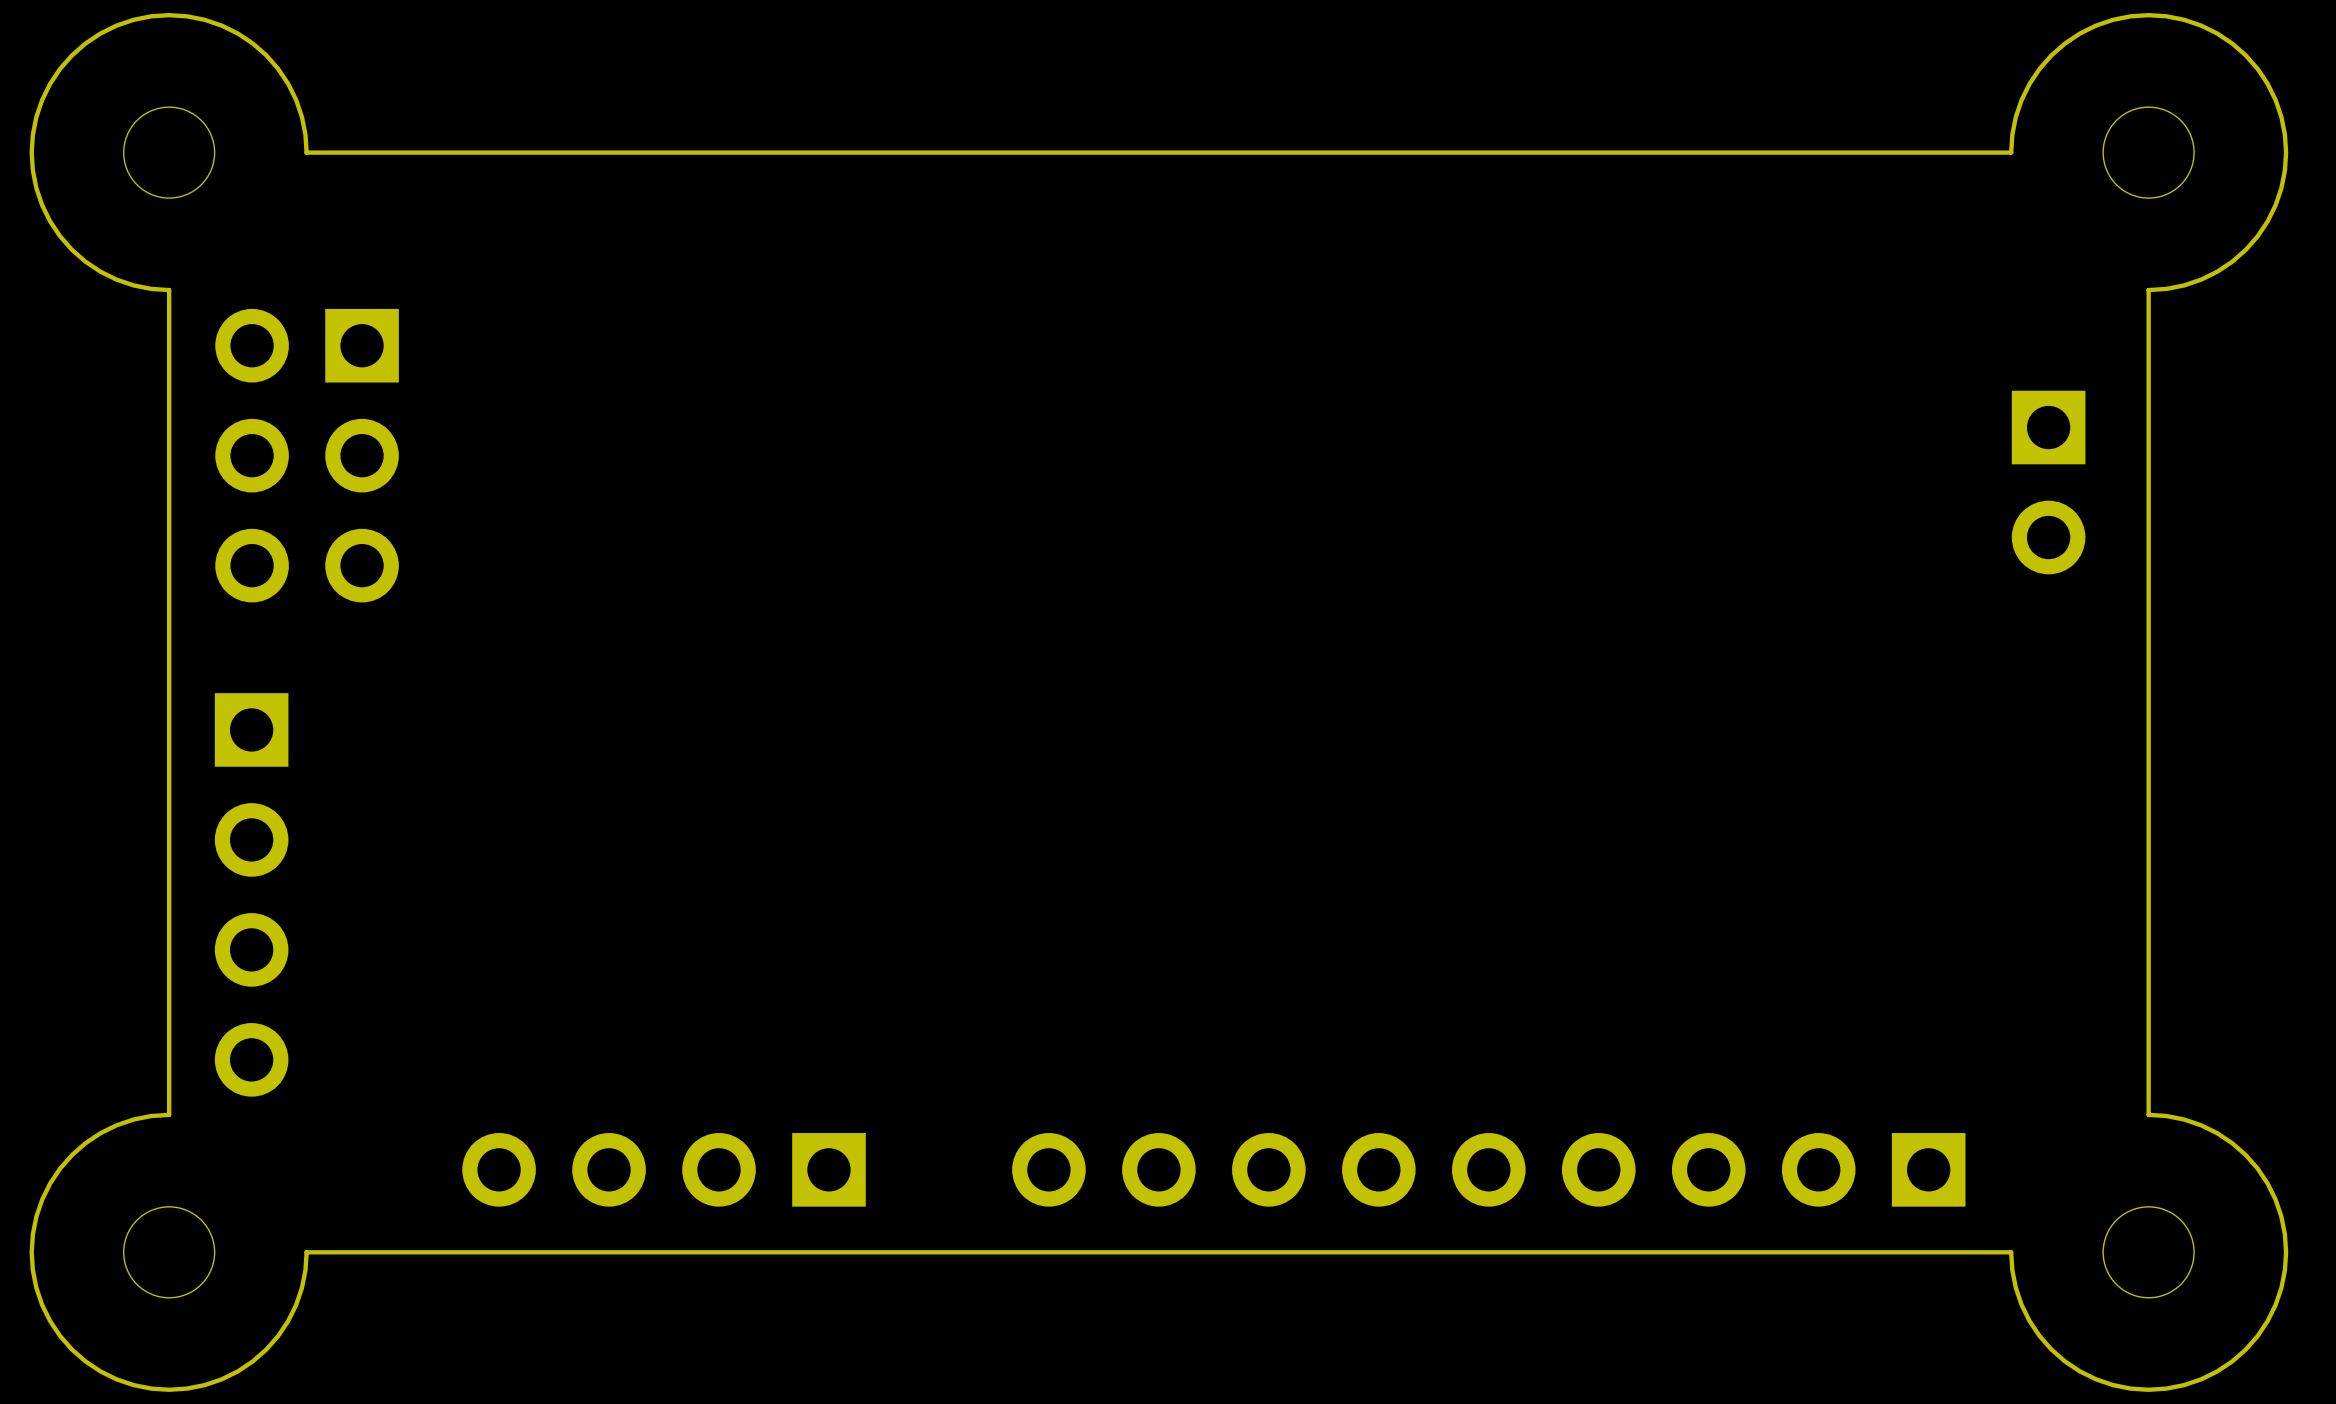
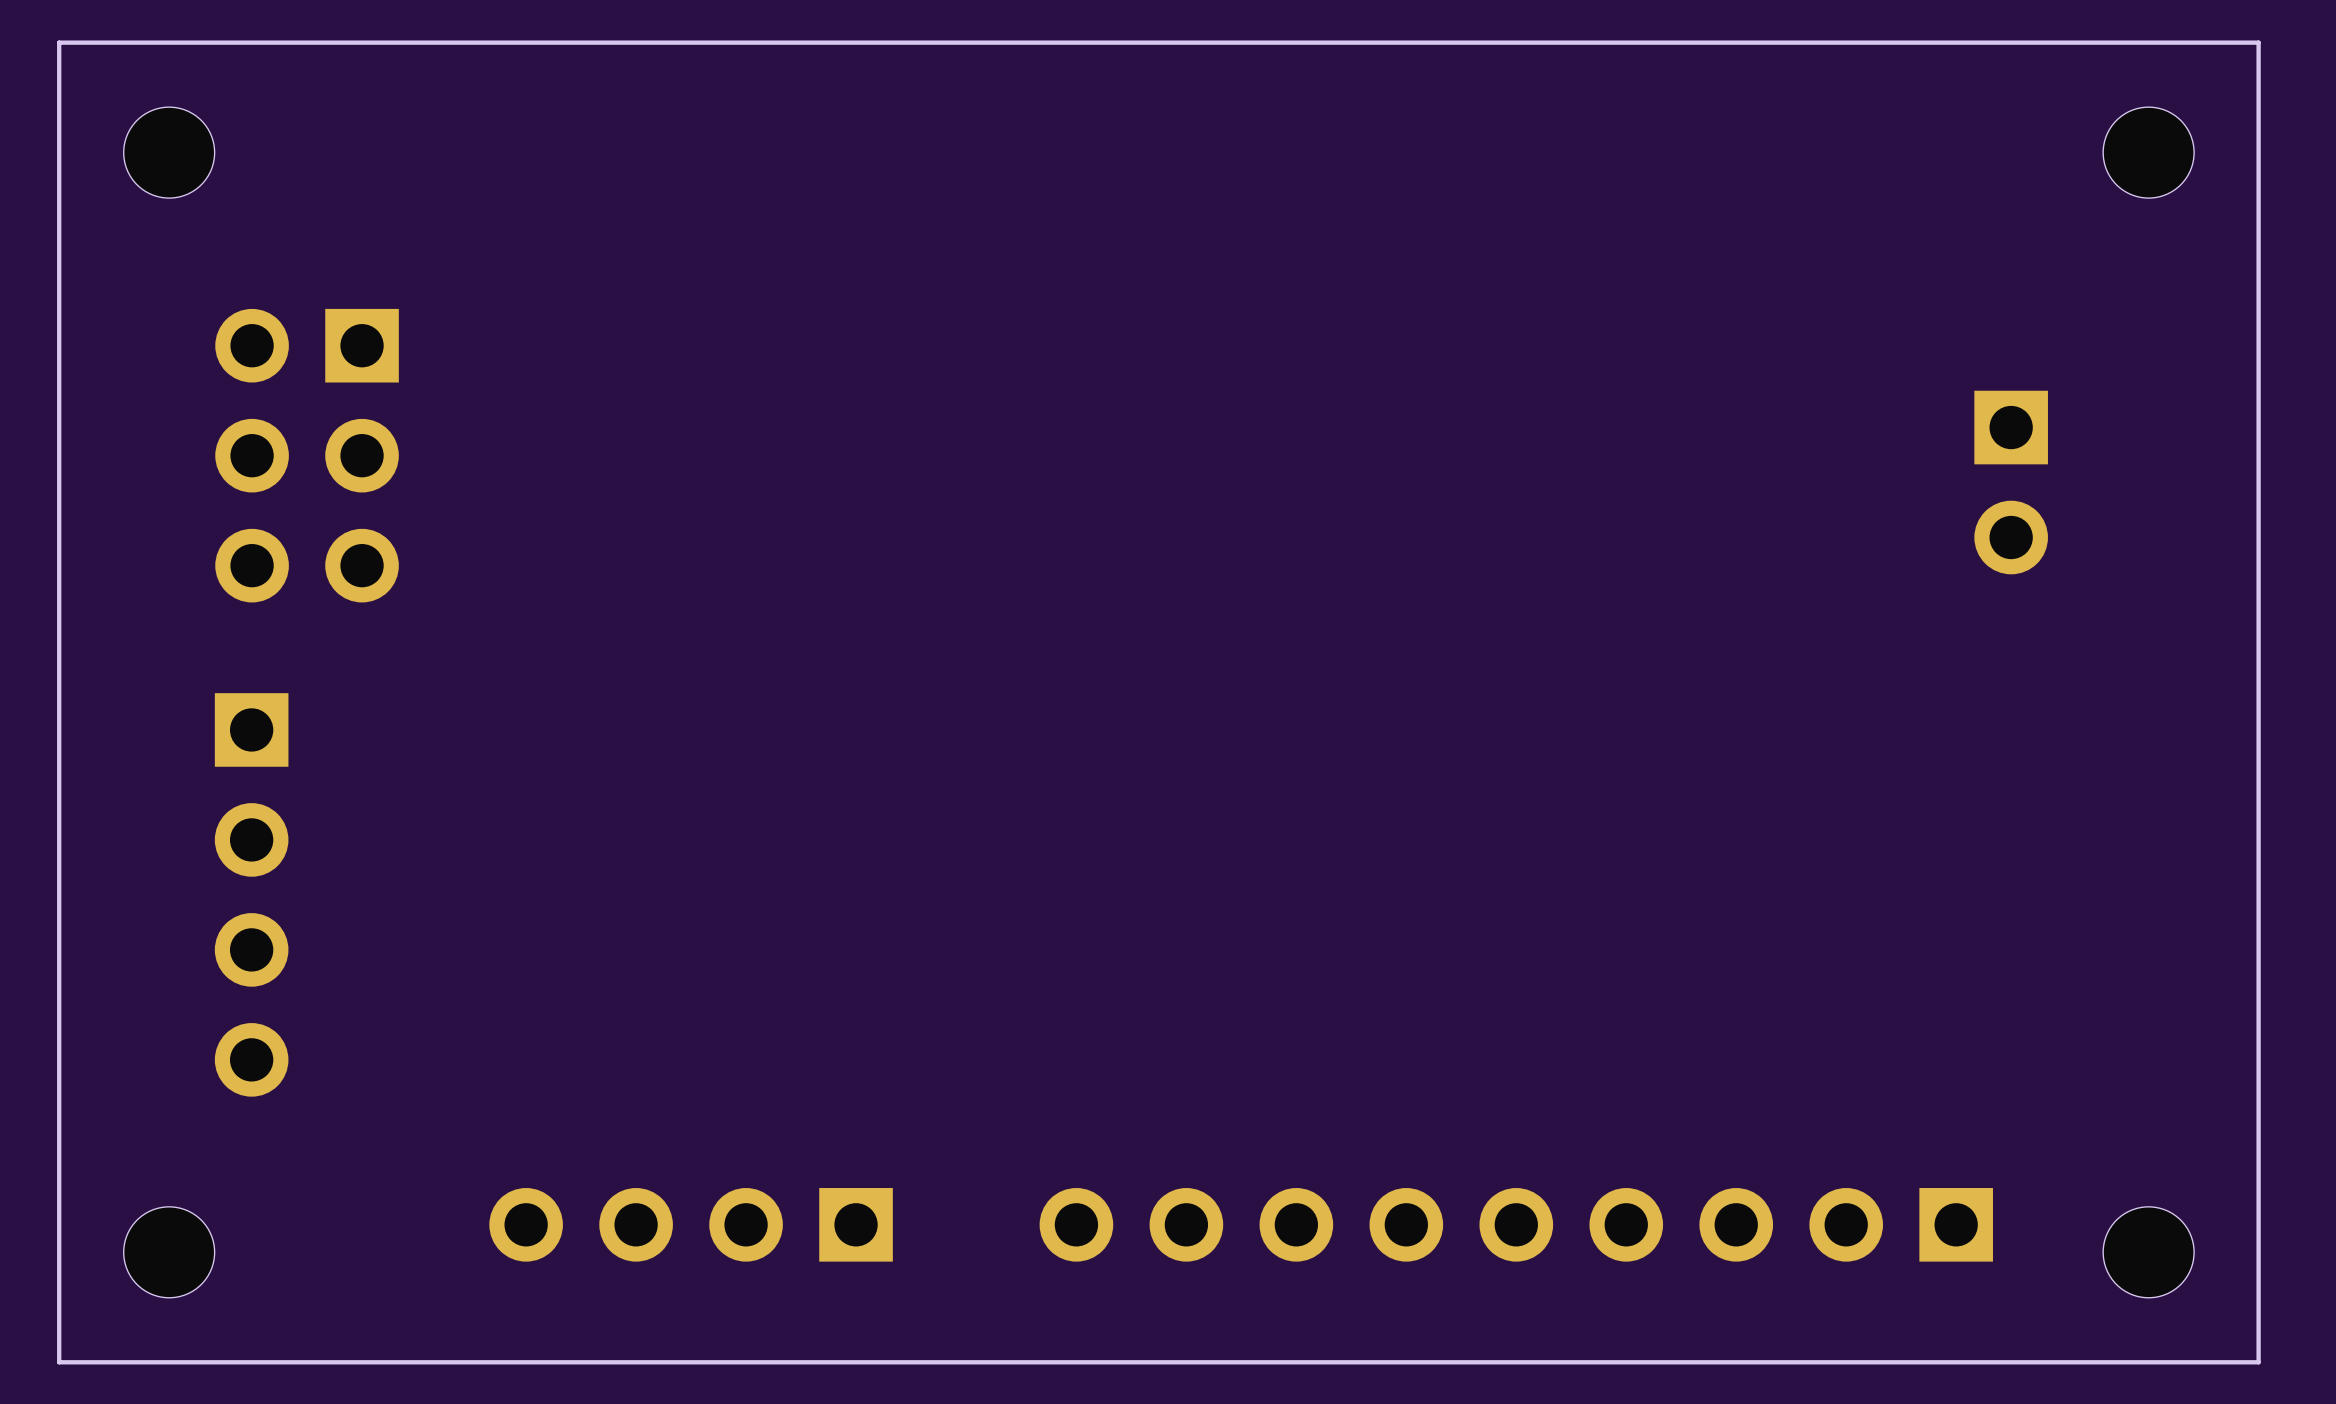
board edge: (2011, 152) (306, 152) (301, 117) (288, 83) (266, 55) (237, 33) (204, 19) (169, 15) (133, 19) (100, 33) (71, 55) (50, 83) (36, 117) (31, 152) (32, 170) (42, 205) (60, 236) (71, 249) (85, 261) (116, 279) (151, 288) (169, 290) (169, 1114) (133, 1119) (100, 1133) (71, 1155) (50, 1183) (36, 1216) (31, 1252) (36, 1287) (50, 1321) (71, 1349) (100, 1371) (133, 1385) (169, 1389) (187, 1388) (221, 1379) (237, 1371) (266, 1349) (278, 1336) (296, 1304) (301, 1287) (306, 1252) (2011, 1252) (2015, 1287) (2029, 1321) (2051, 1349) (2079, 1371) (2113, 1385) (2148, 1389) (2184, 1385) (2217, 1371) (2245, 1349) (2267, 1321) (2281, 1287) (2286, 1252) (2284, 1234) (2275, 1199) (2267, 1183) (2245, 1155) (2232, 1143) (2201, 1125) (2184, 1119) (2148, 1114) (2148, 290) (2166, 288) (2201, 279) (2217, 271) (2245, 249) (2257, 236) (2275, 205) (2284, 170) (2284, 134) (2275, 100) (2267, 83) (2245, 55) (2232, 43) (2217, 33) (2184, 19) (2148, 15) (2130, 16) (2096, 25) (2079, 33) (2064, 43) (2039, 68) (2021, 100) (2015, 117) (2011, 152) -> (2258, 42) (2258, 1362) (59, 1362) (59, 42) (2258, 42)
part position: (2048, 482) -> (2011, 482)
part position: (664, 1169) -> (691, 1224)
part position: (1488, 1169) -> (1516, 1224)

